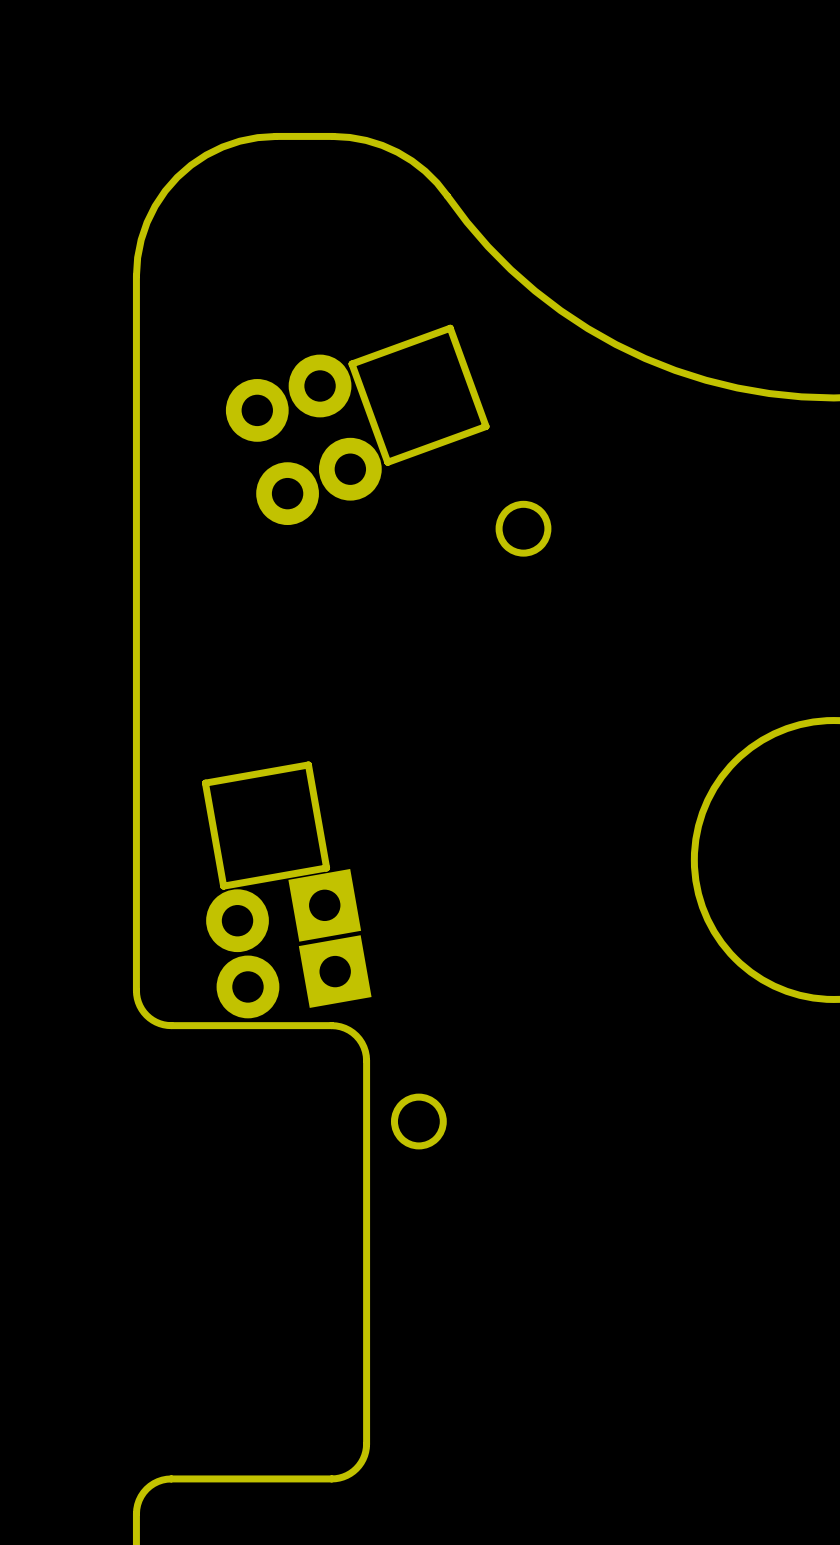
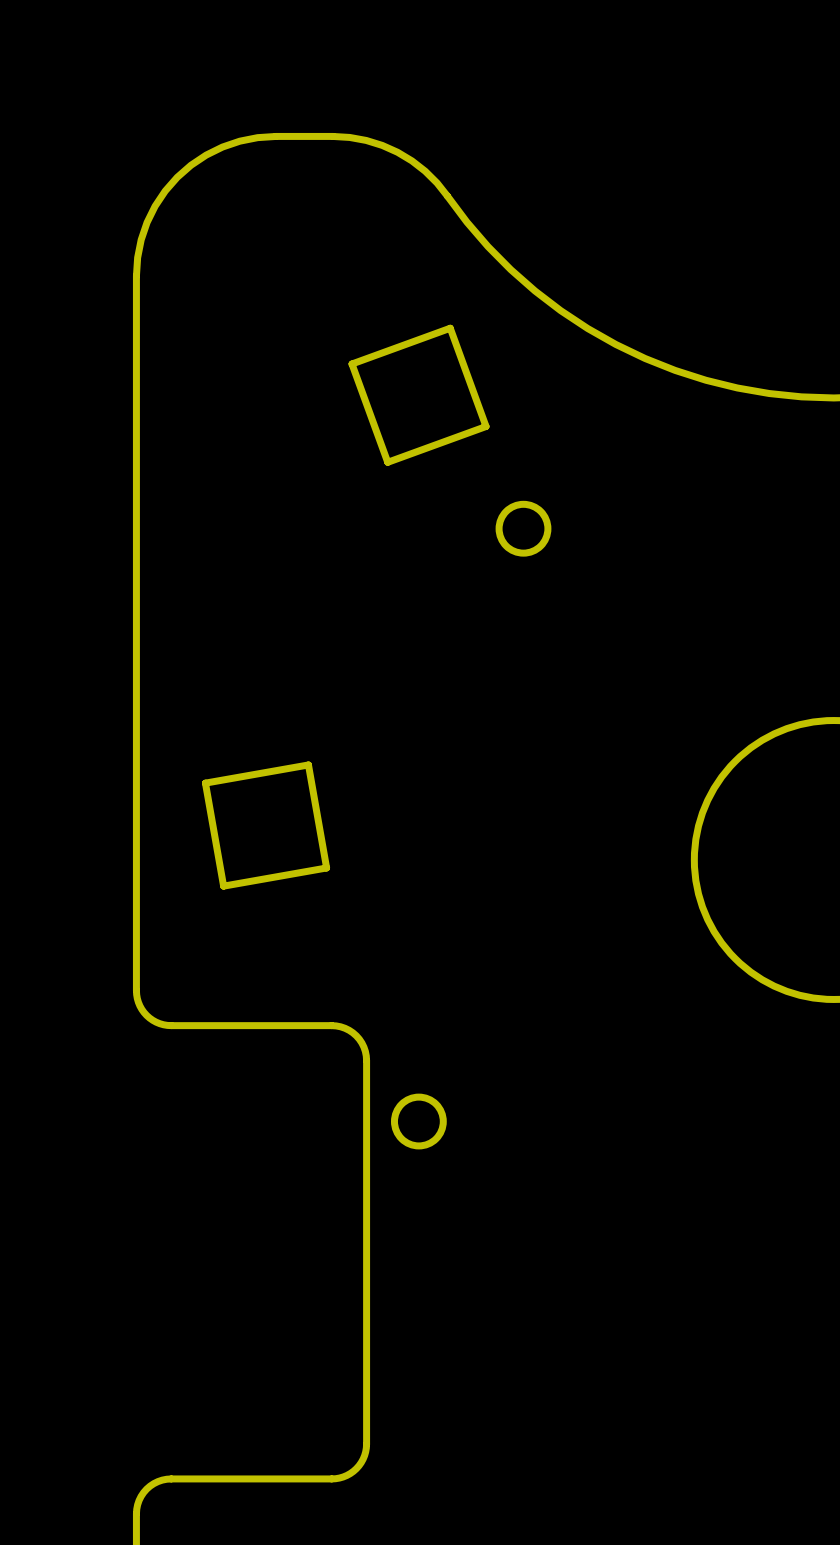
part: (335, 427) -> none
part: (272, 452) -> none
part: (283, 910) -> none
part: (294, 976) -> none

